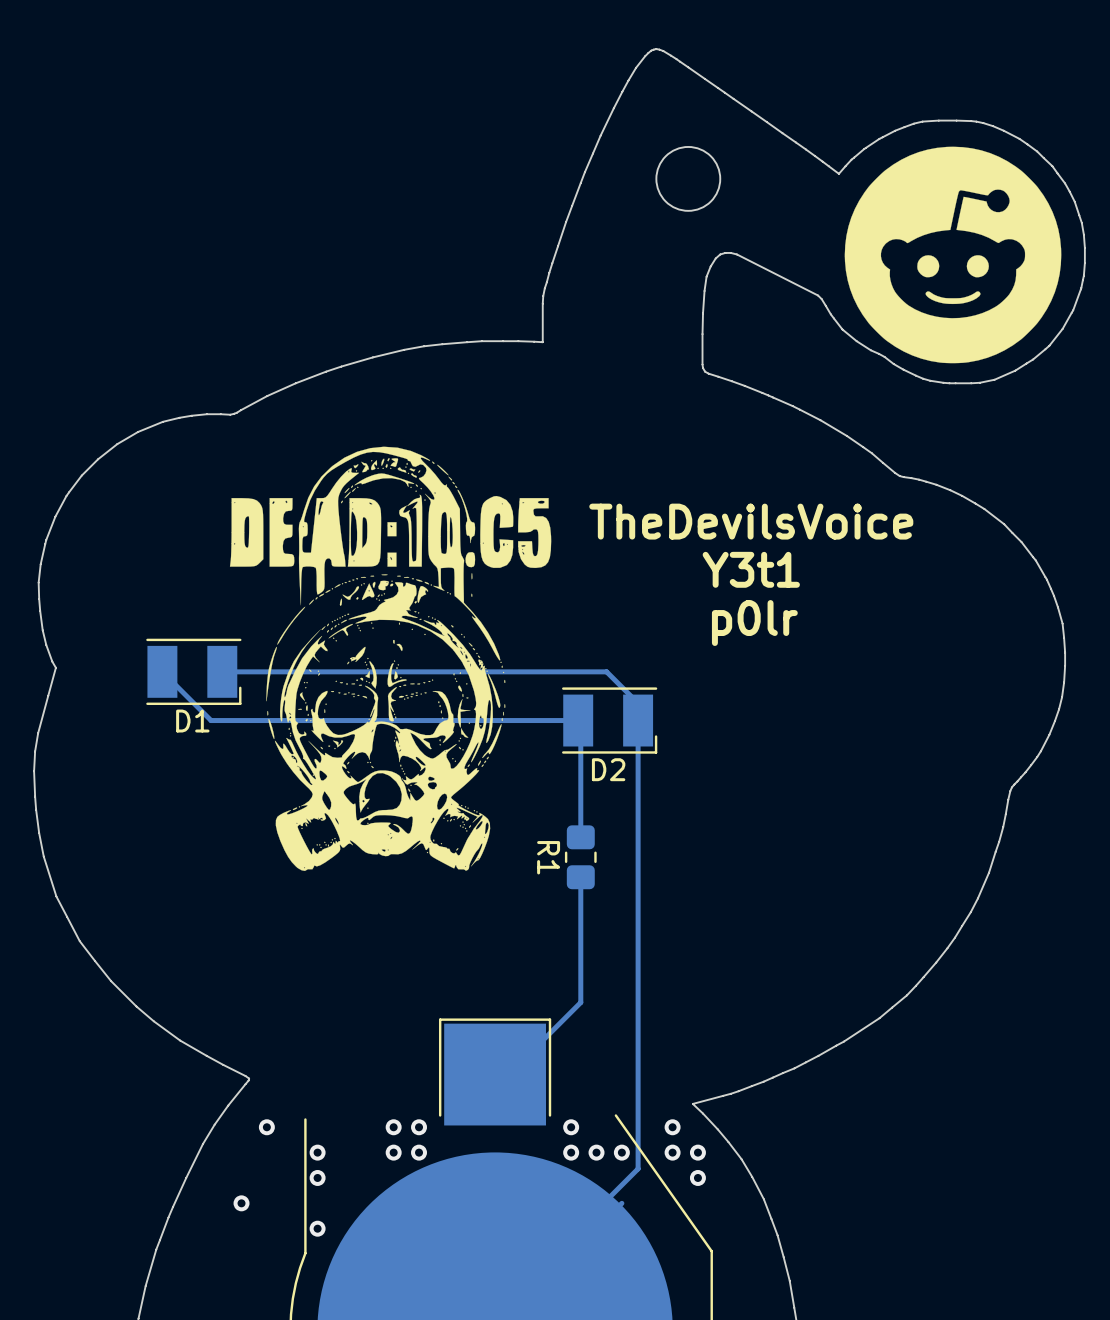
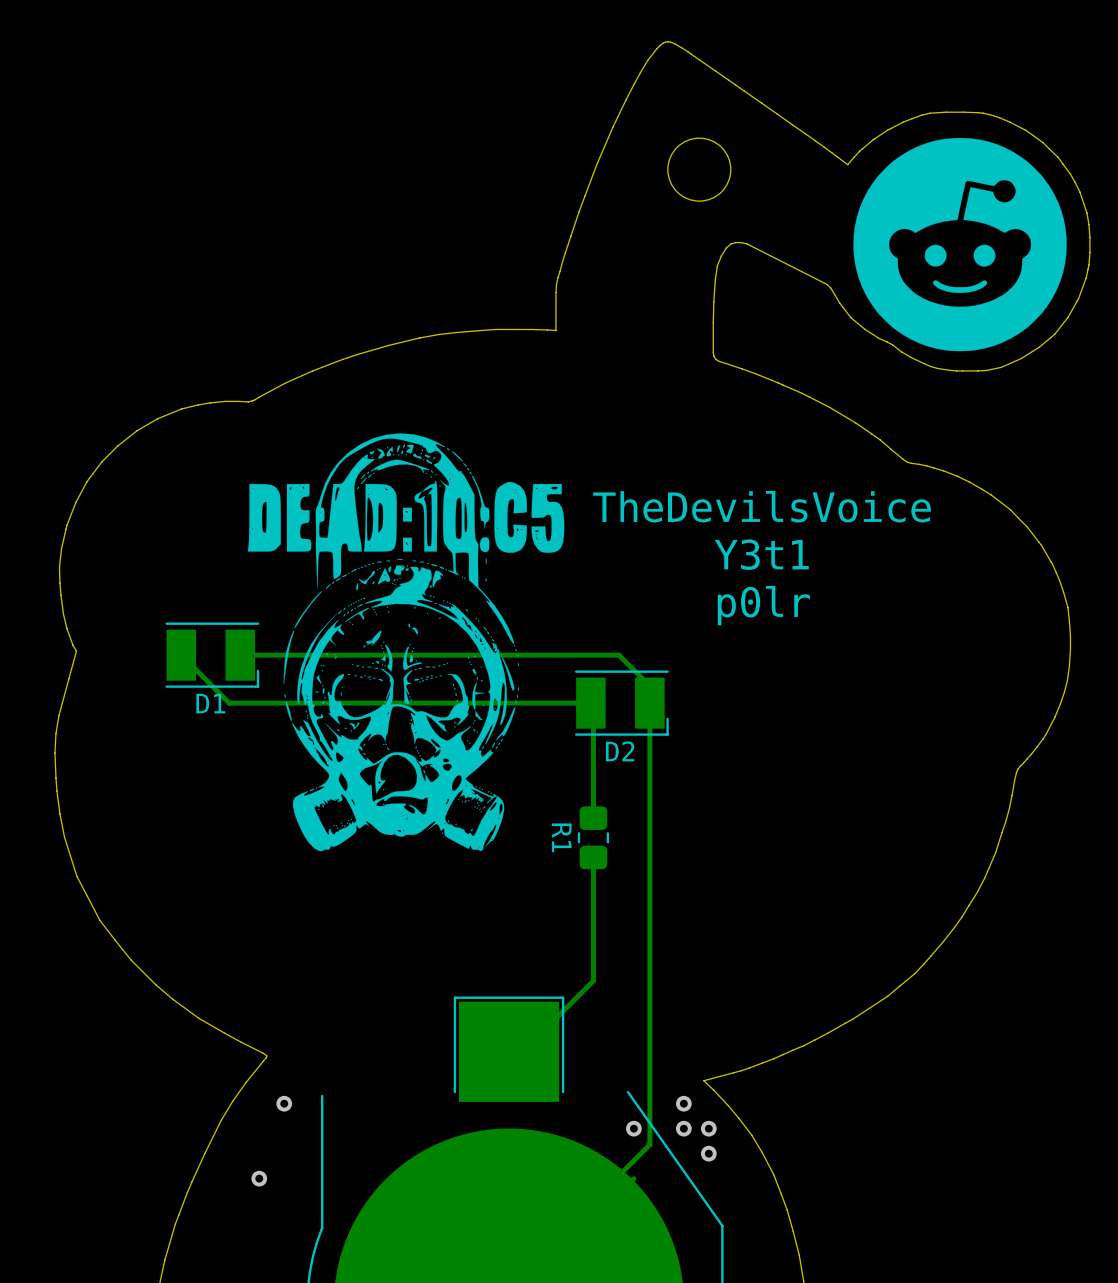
via: (393, 1127) -> none
via: (419, 1127) -> none
via: (571, 1127) -> none
via: (317, 1152) -> none
via: (393, 1152) -> none
via: (419, 1152) -> none
via: (571, 1152) -> none
via: (596, 1152) -> none
via: (317, 1177) -> none
via: (317, 1228) -> none

